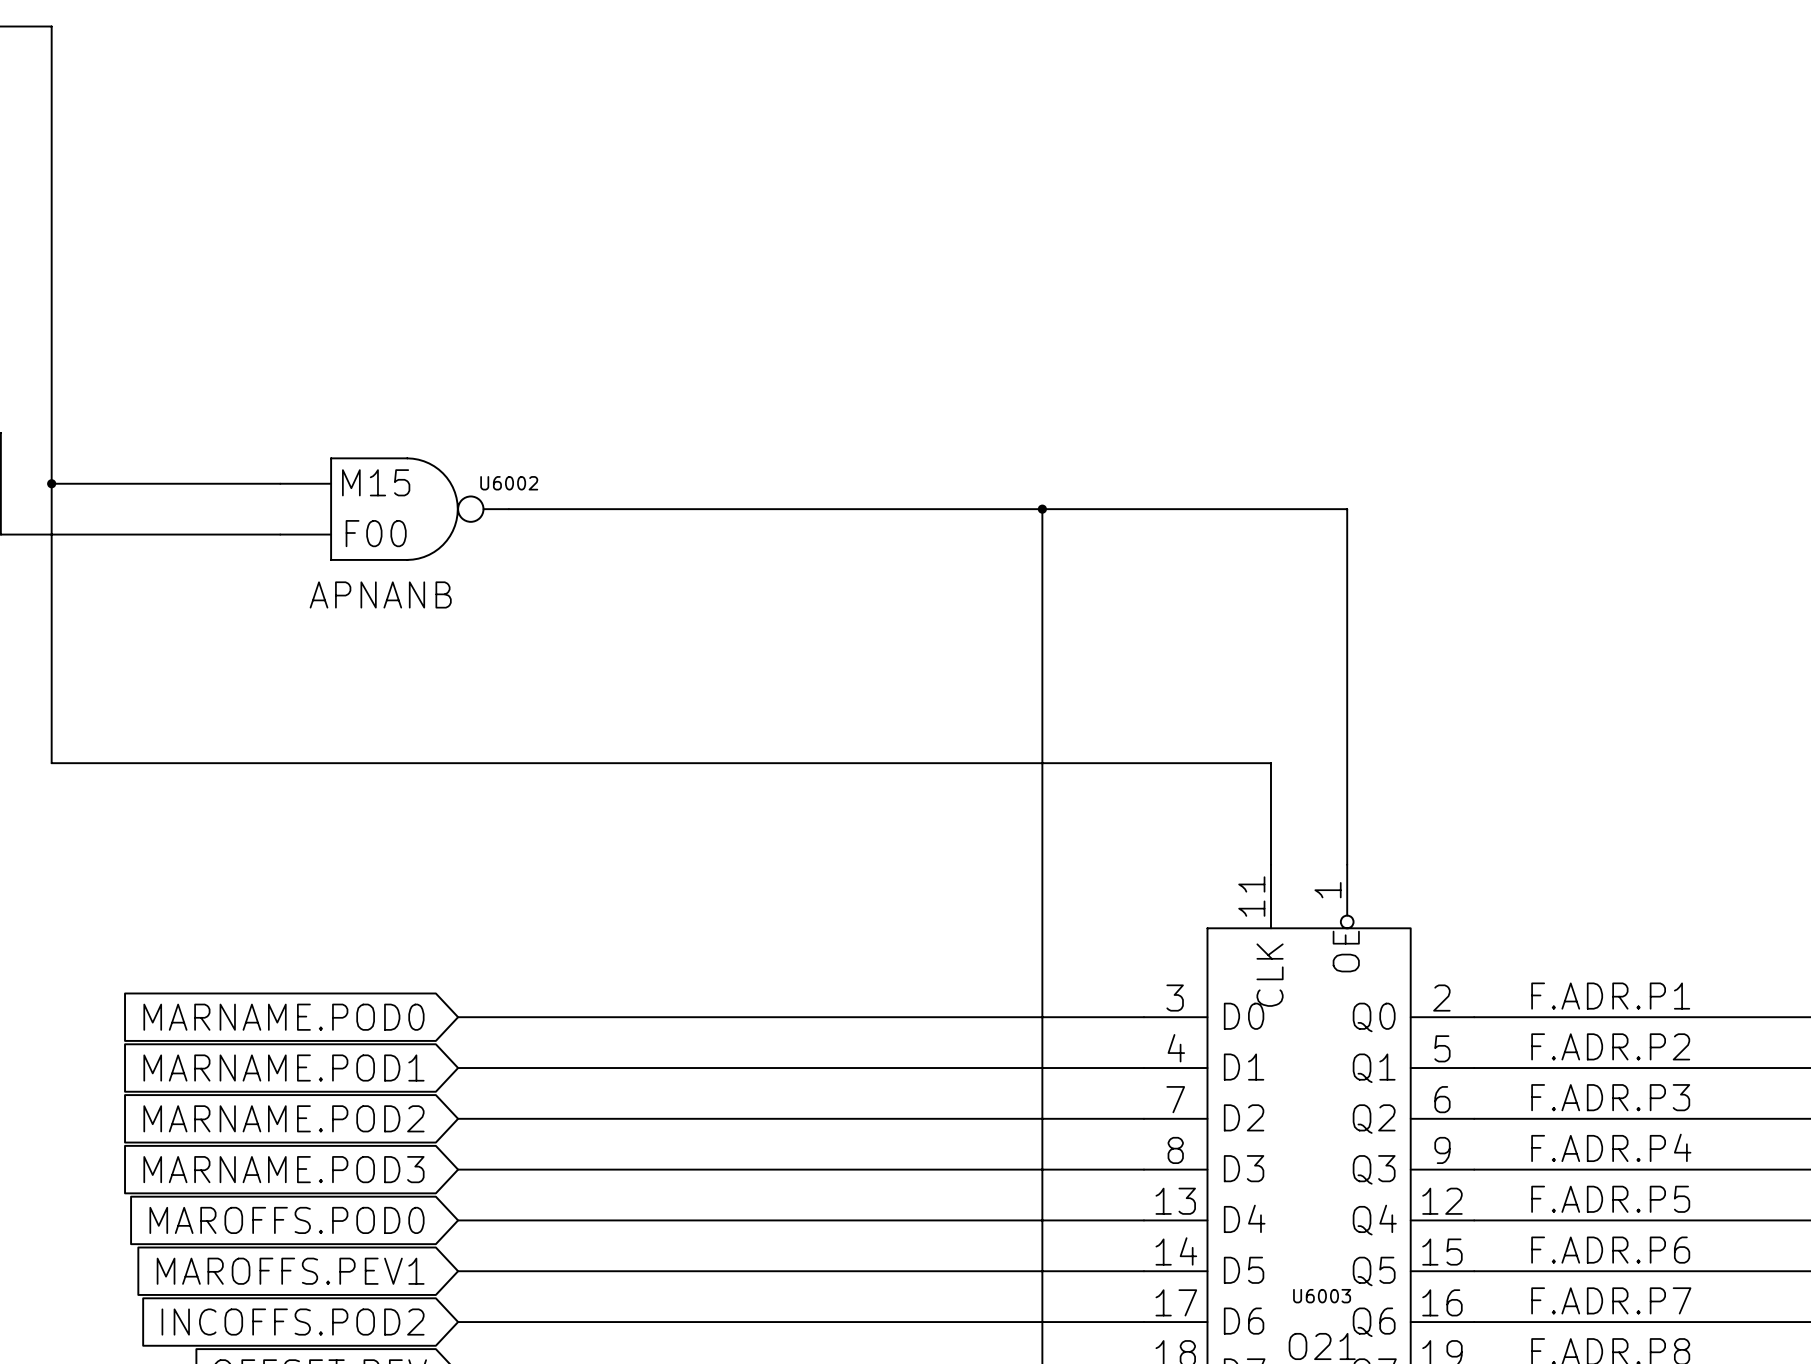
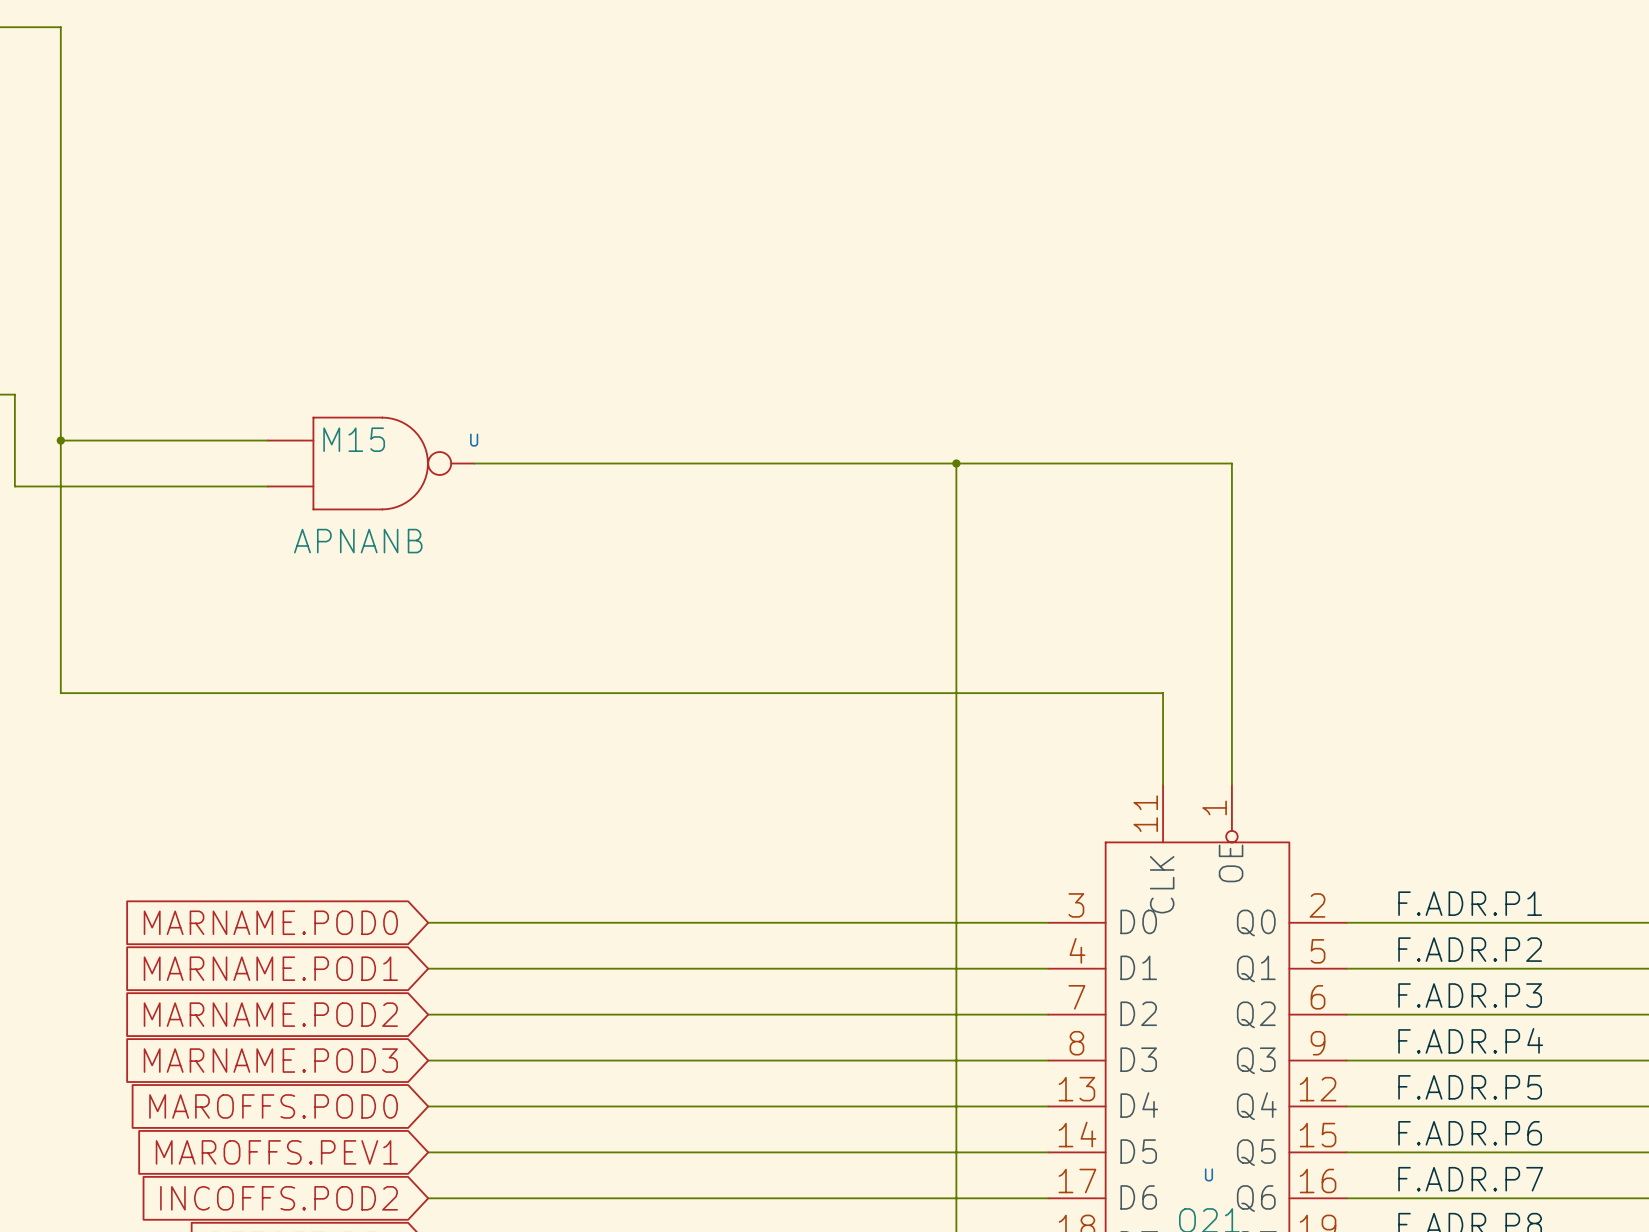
U6002 name: U6002 (509, 483) -> U (474, 440)
U6002 value: F00 (376, 533) -> none
U6003 name: U6003 (1322, 1296) -> U (1208, 1174)

